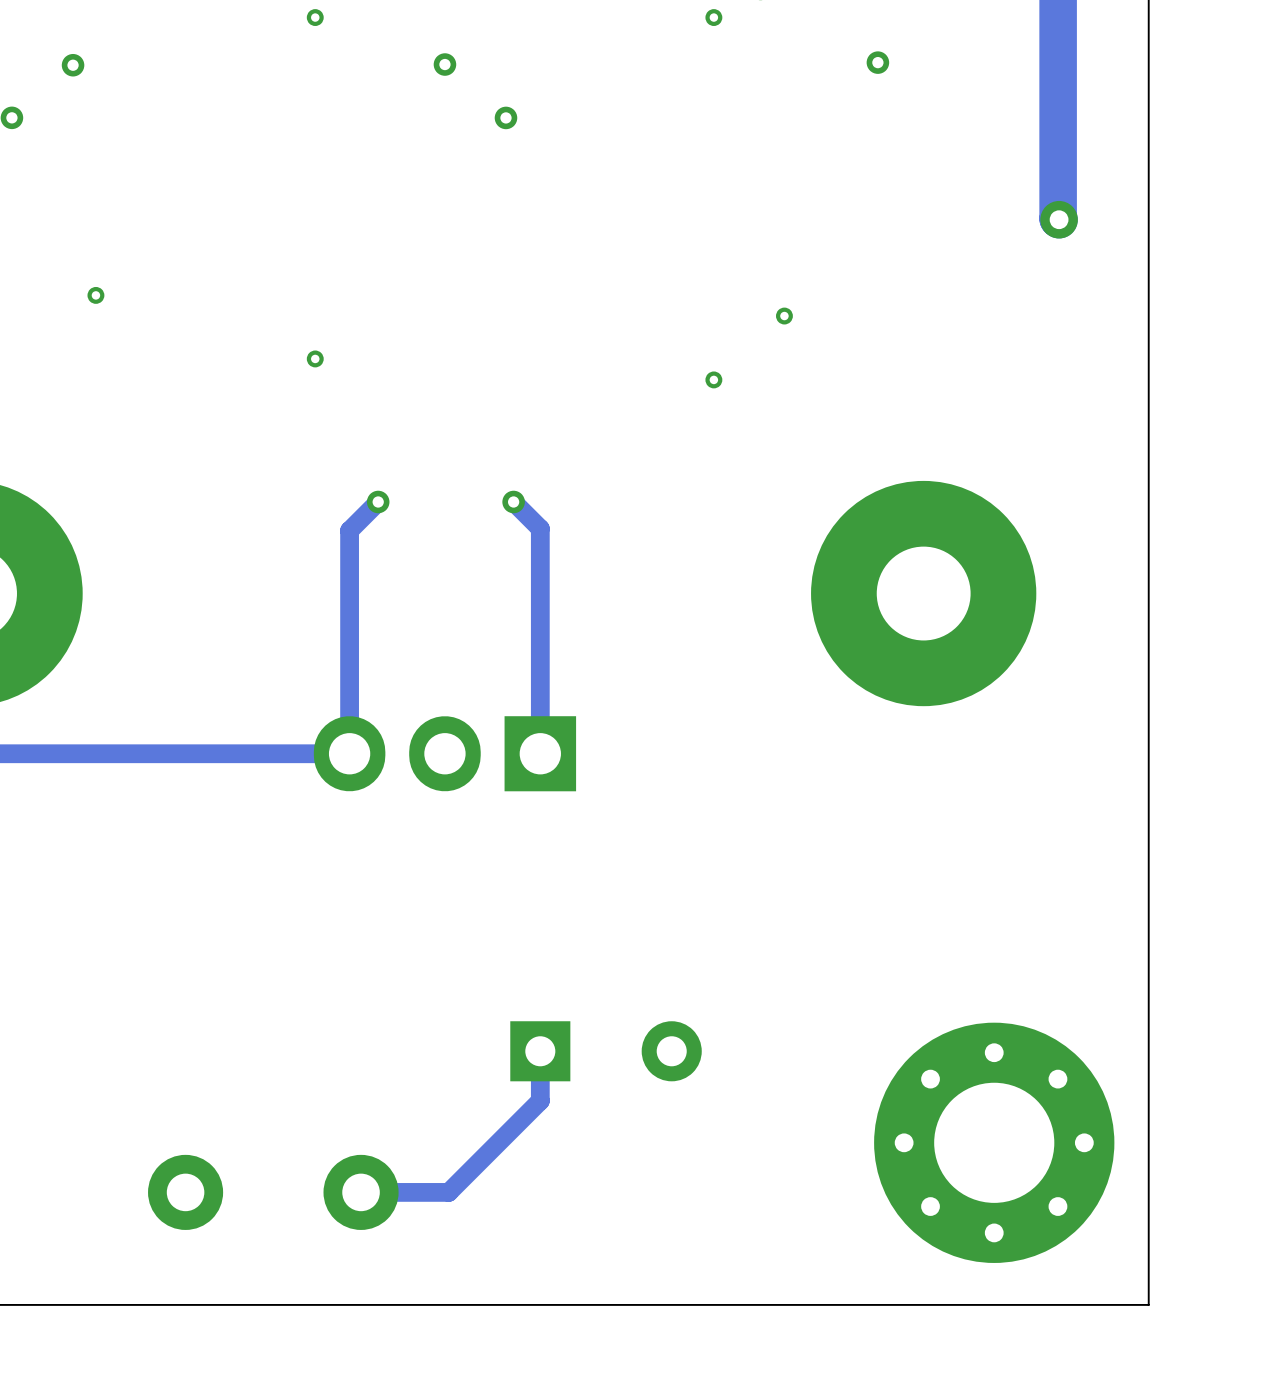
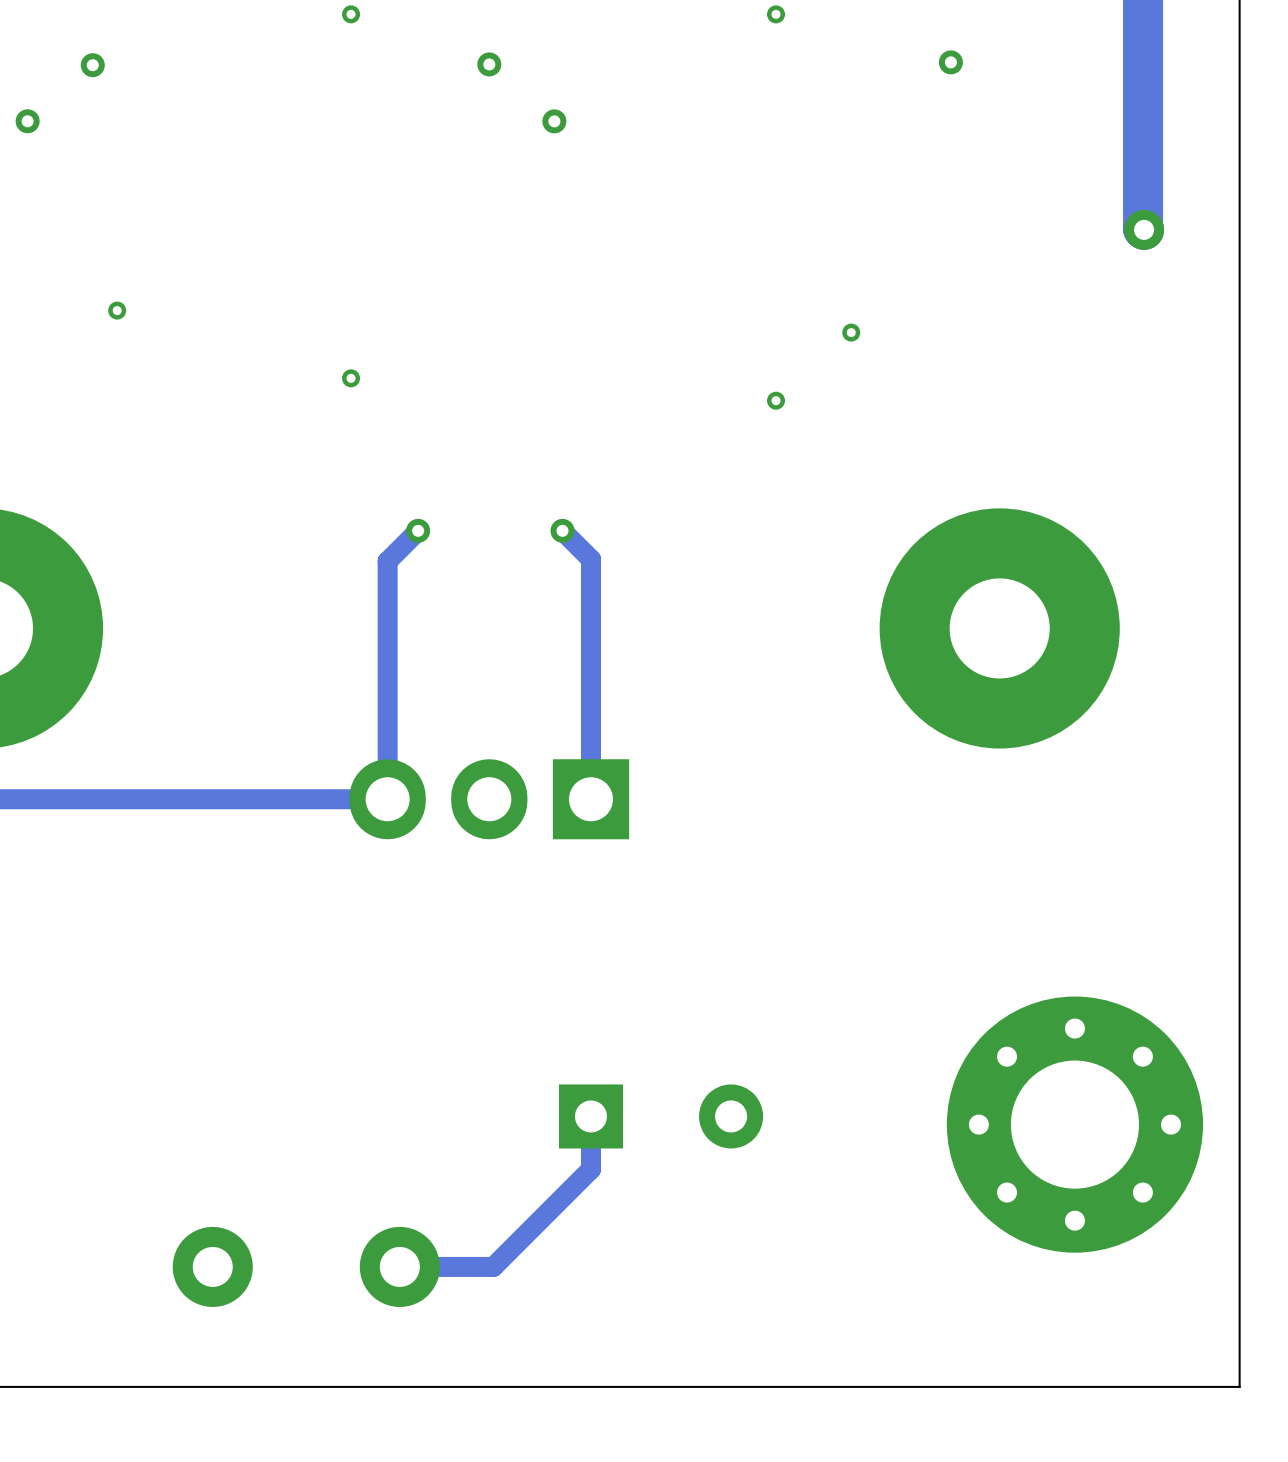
part position: (994, 1142) -> (1074, 1124)

